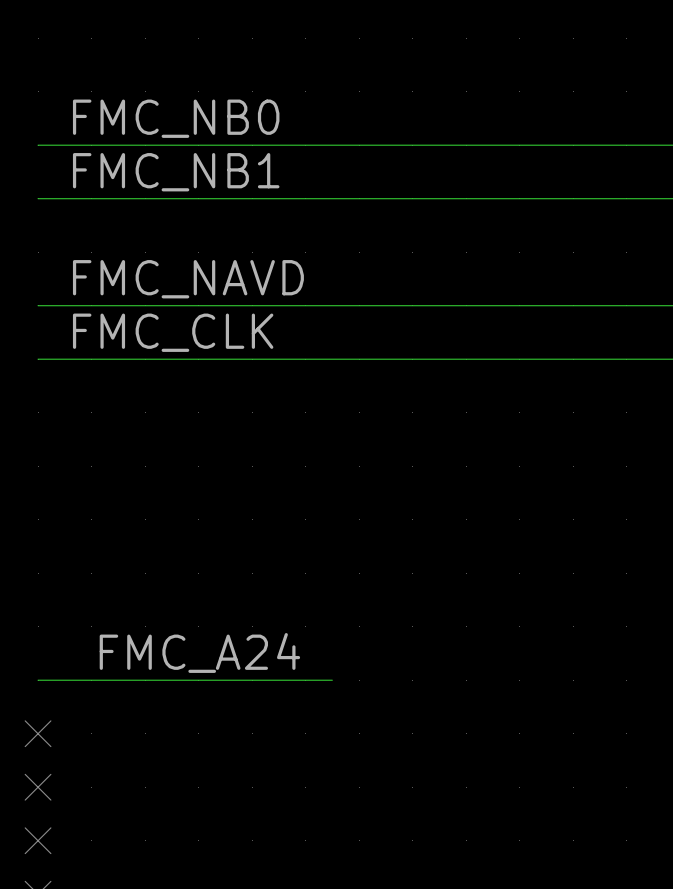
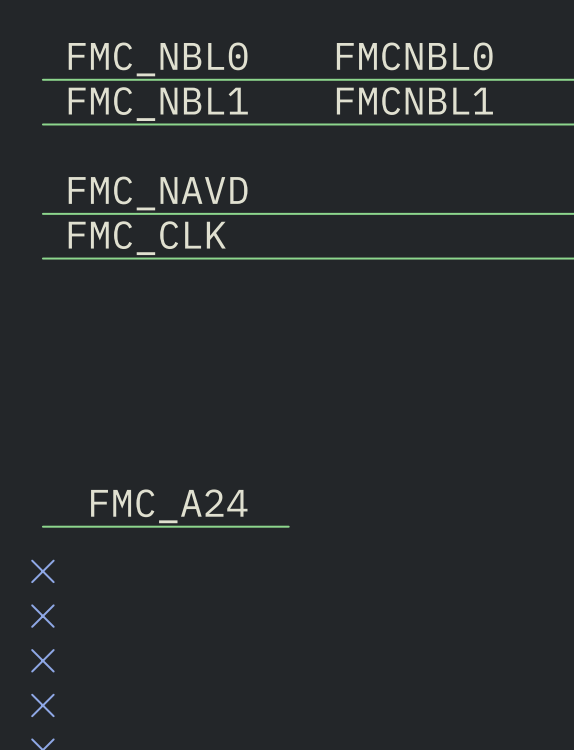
label: none -> FMCNBL0 (414, 56)
label: FMC_NB0 (176, 118) -> FMC_NBL0 (158, 59)
label: none -> FMCNBL1 (414, 101)
label: FMC_NB1 (176, 172) -> FMC_NBL1 (158, 104)

